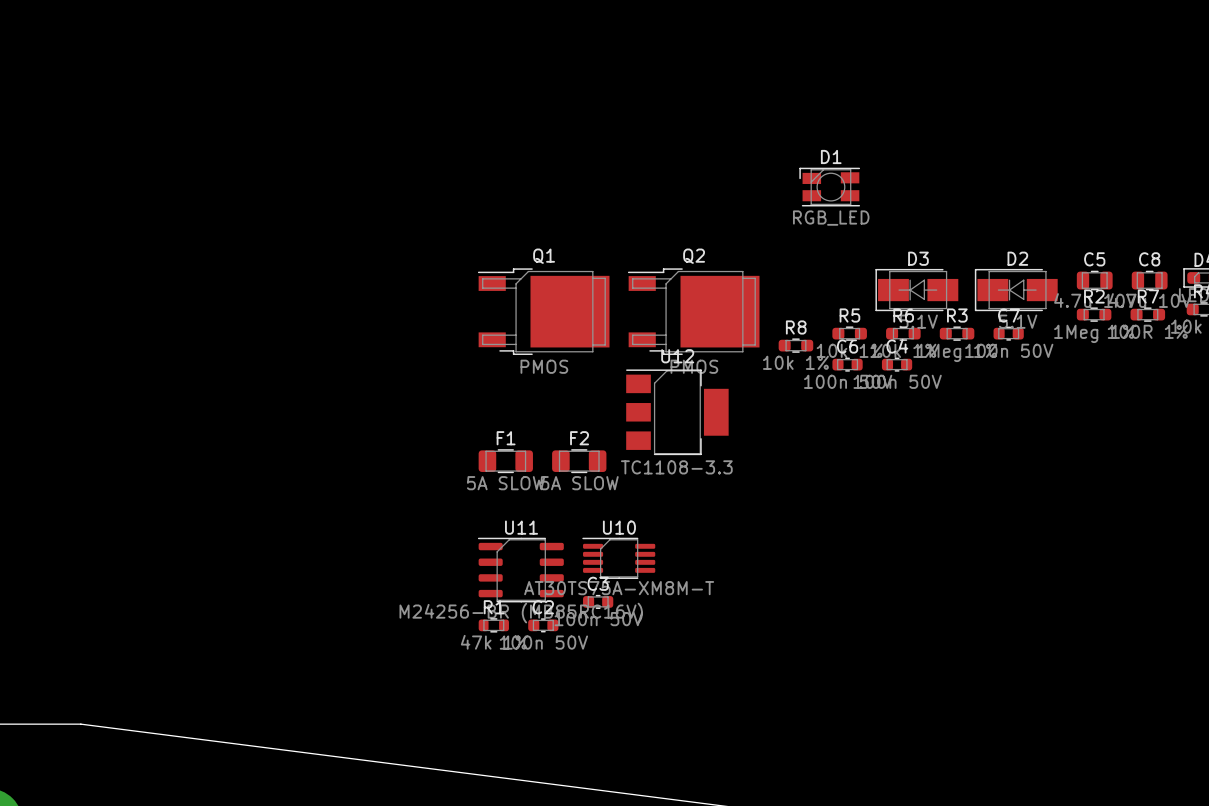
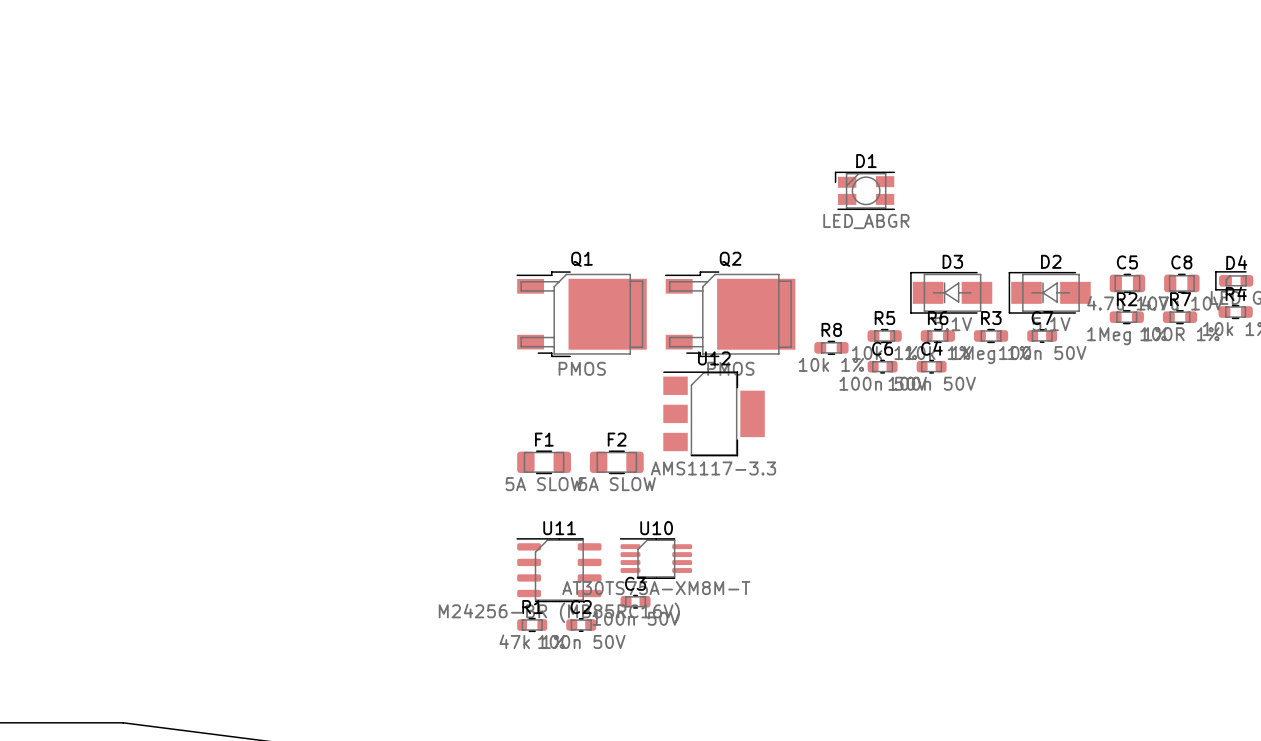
D1 value: RGB_LED (831, 218) -> LED_ABGR (866, 221)
U12 value: TC1108-3.3 (676, 467) -> AMS1117-3.3 (713, 468)

